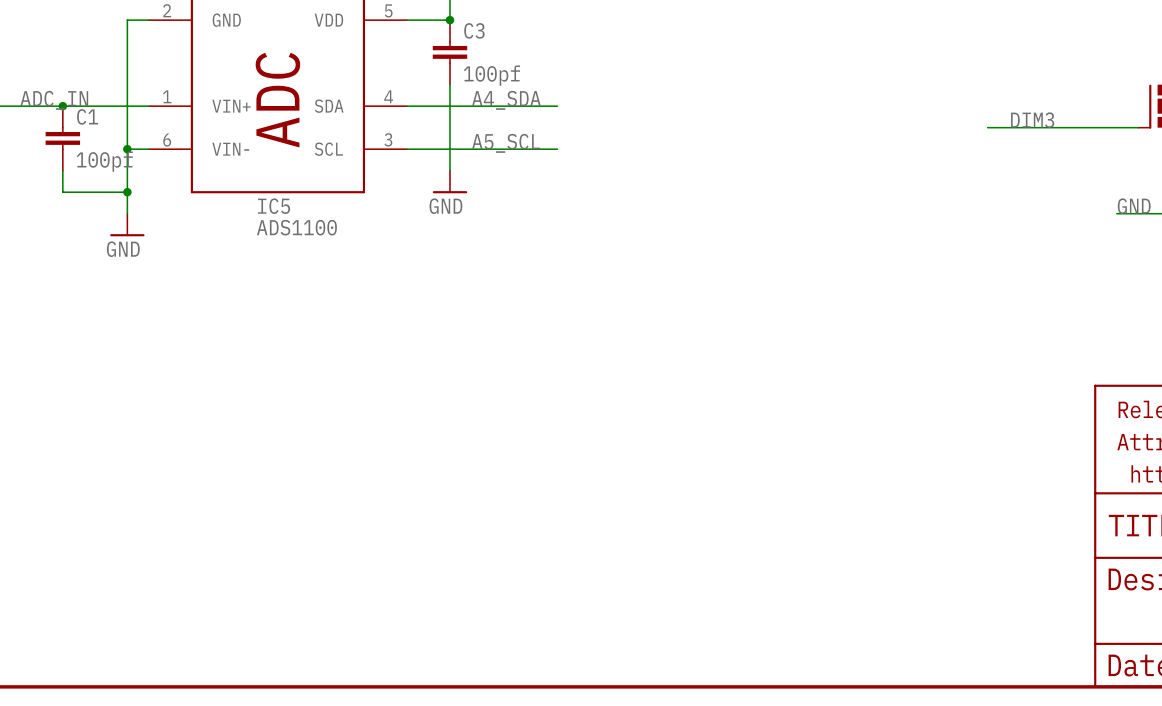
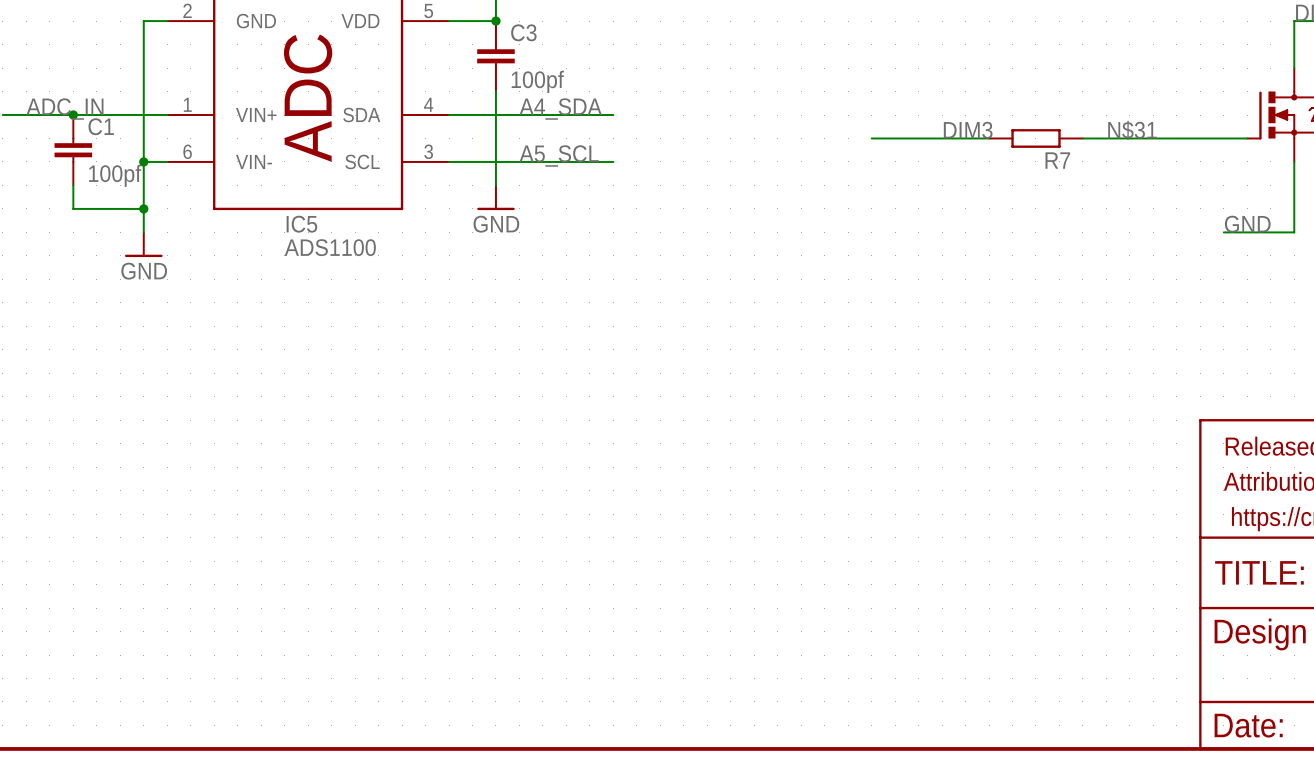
label: none -> DIM3 (968, 130)
label: DIM3 (1032, 120) -> N$31 (1132, 130)
wire: none -> (871, 138) (989, 138)
R7: none -> (1035, 138)

